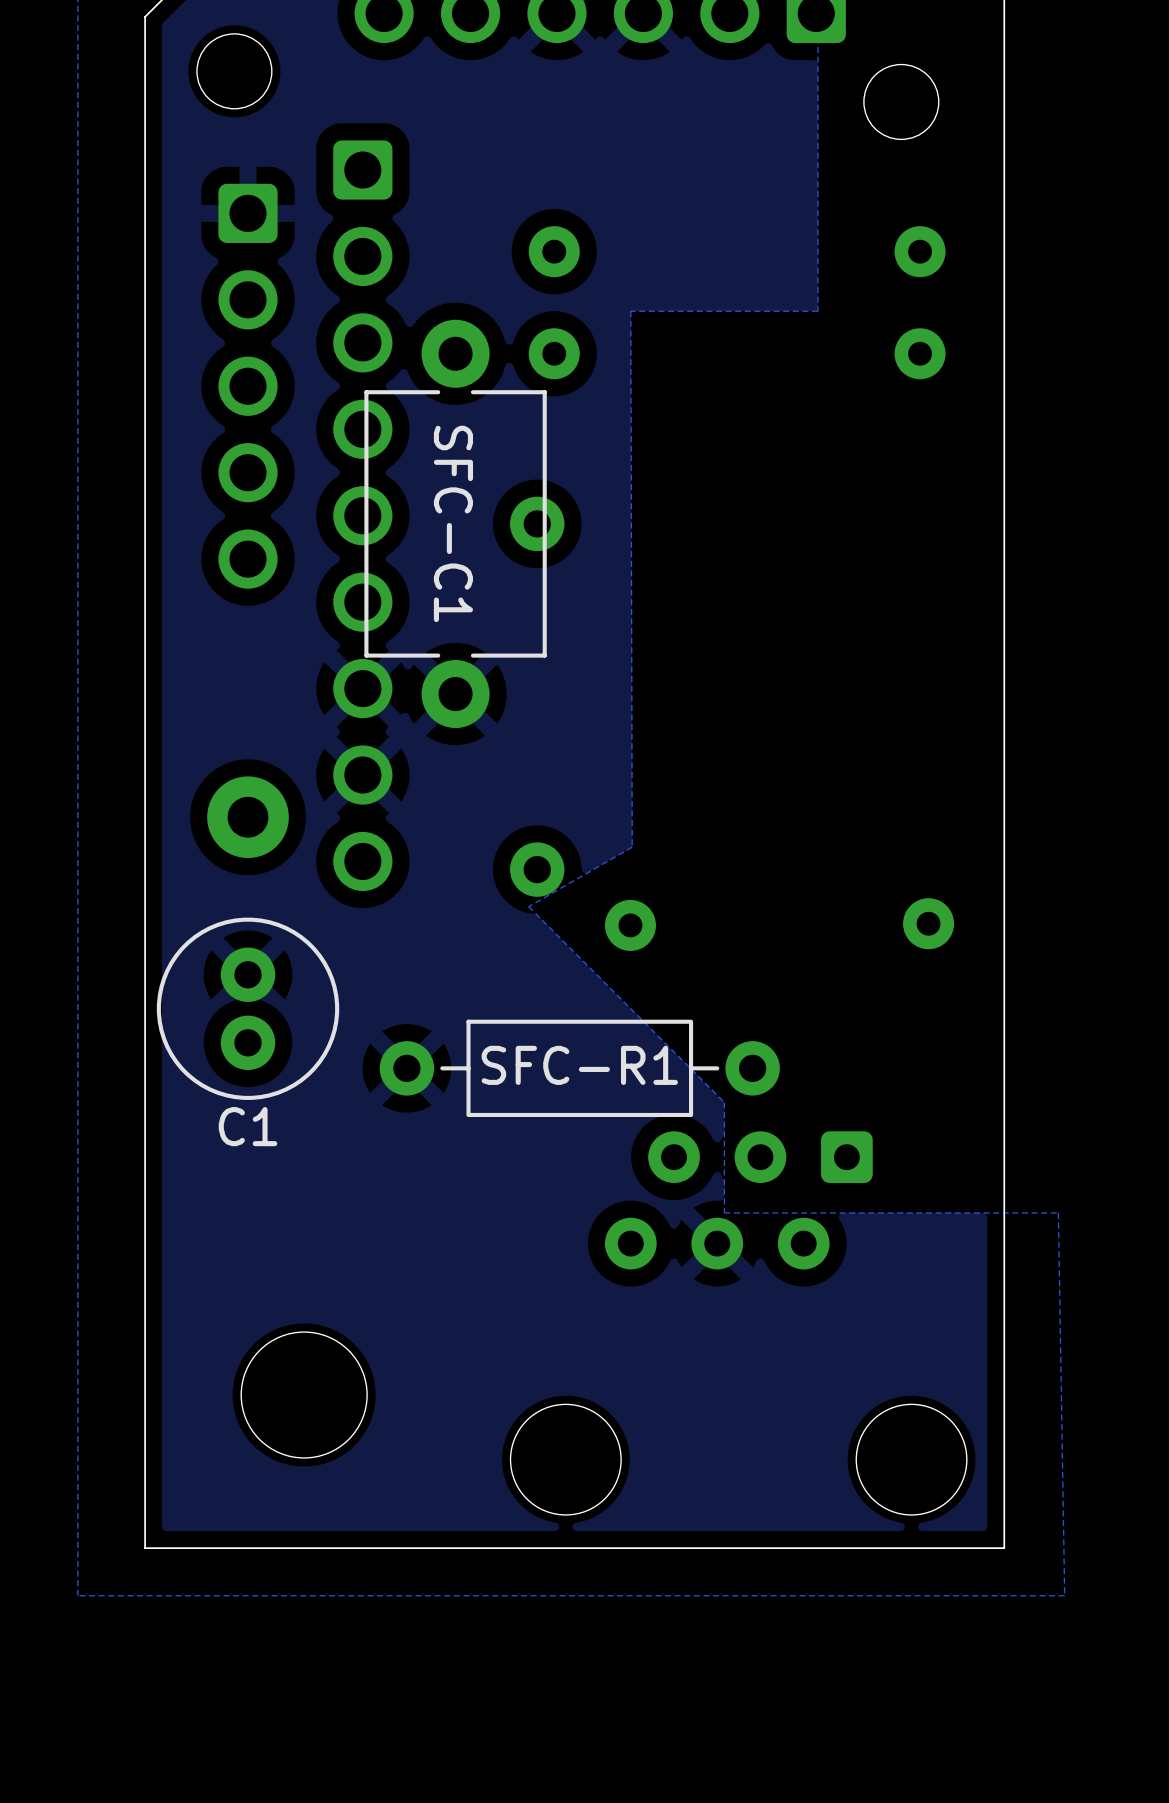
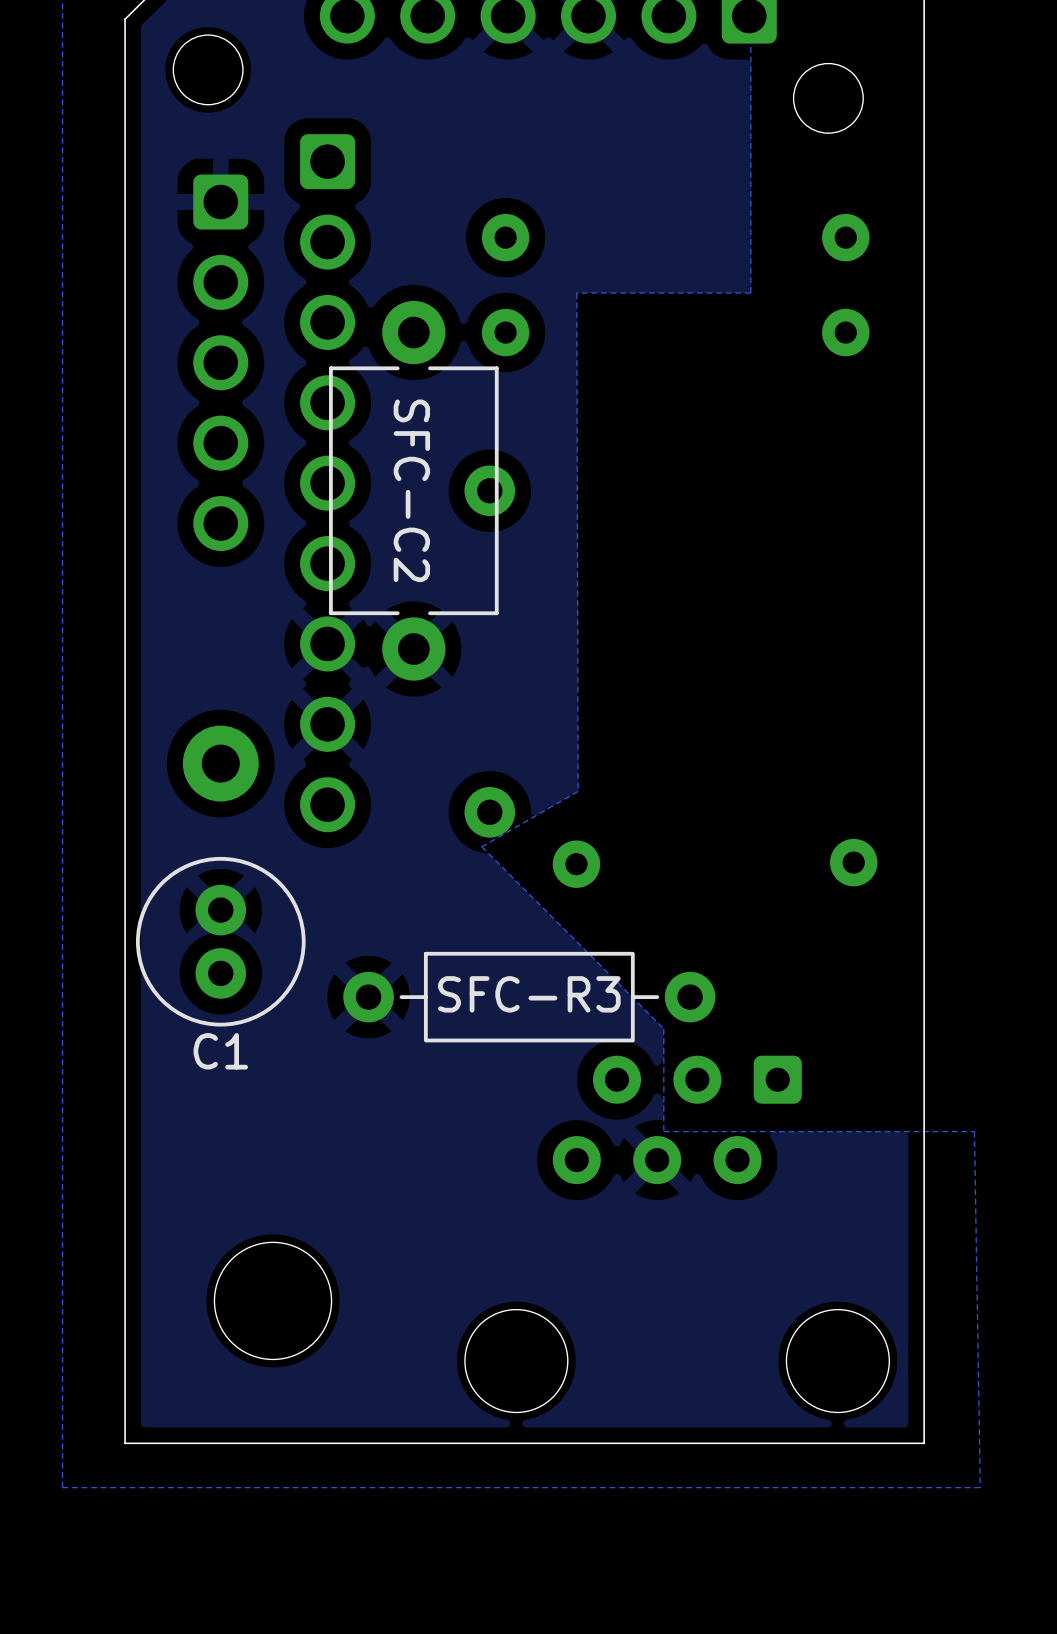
SFC-C1 name: SFC-C1 (453, 523) -> SFC-C2 (411, 490)
SFC-R1 name: SFC-R1 (579, 1065) -> SFC-R3 (529, 994)

